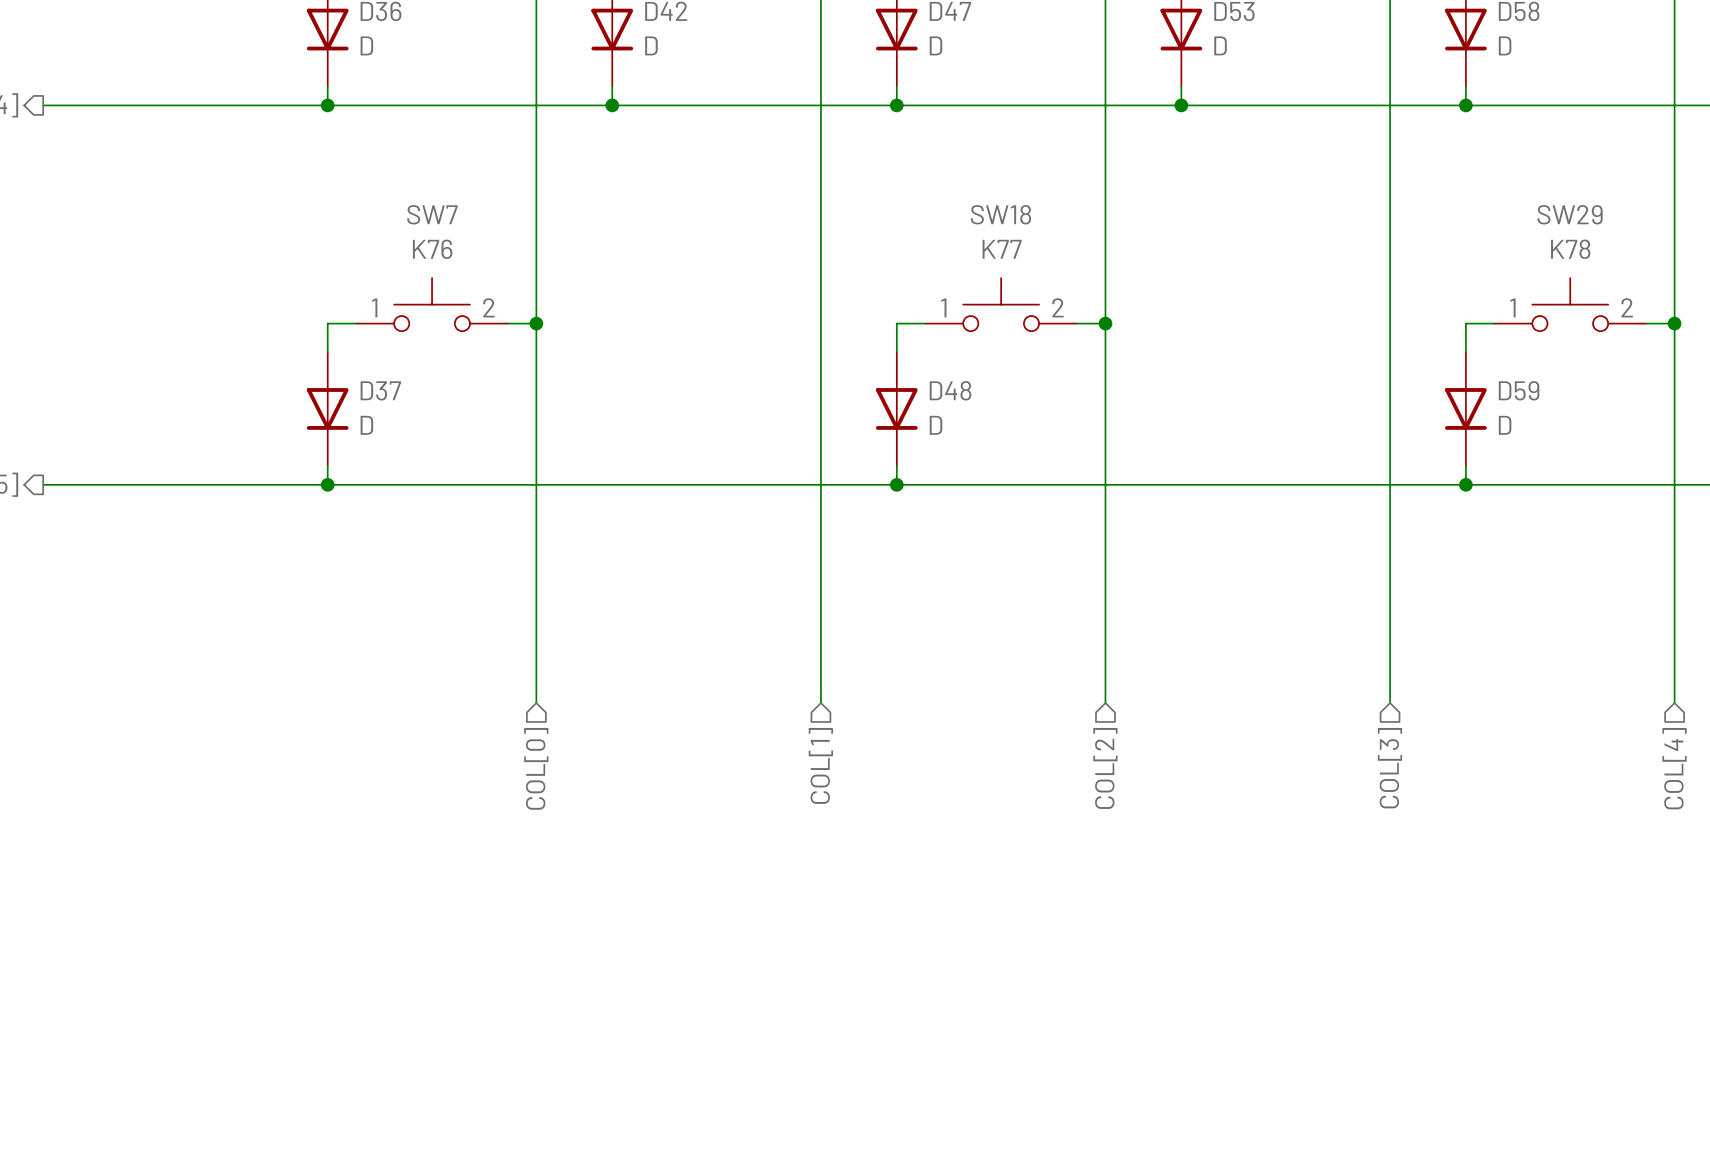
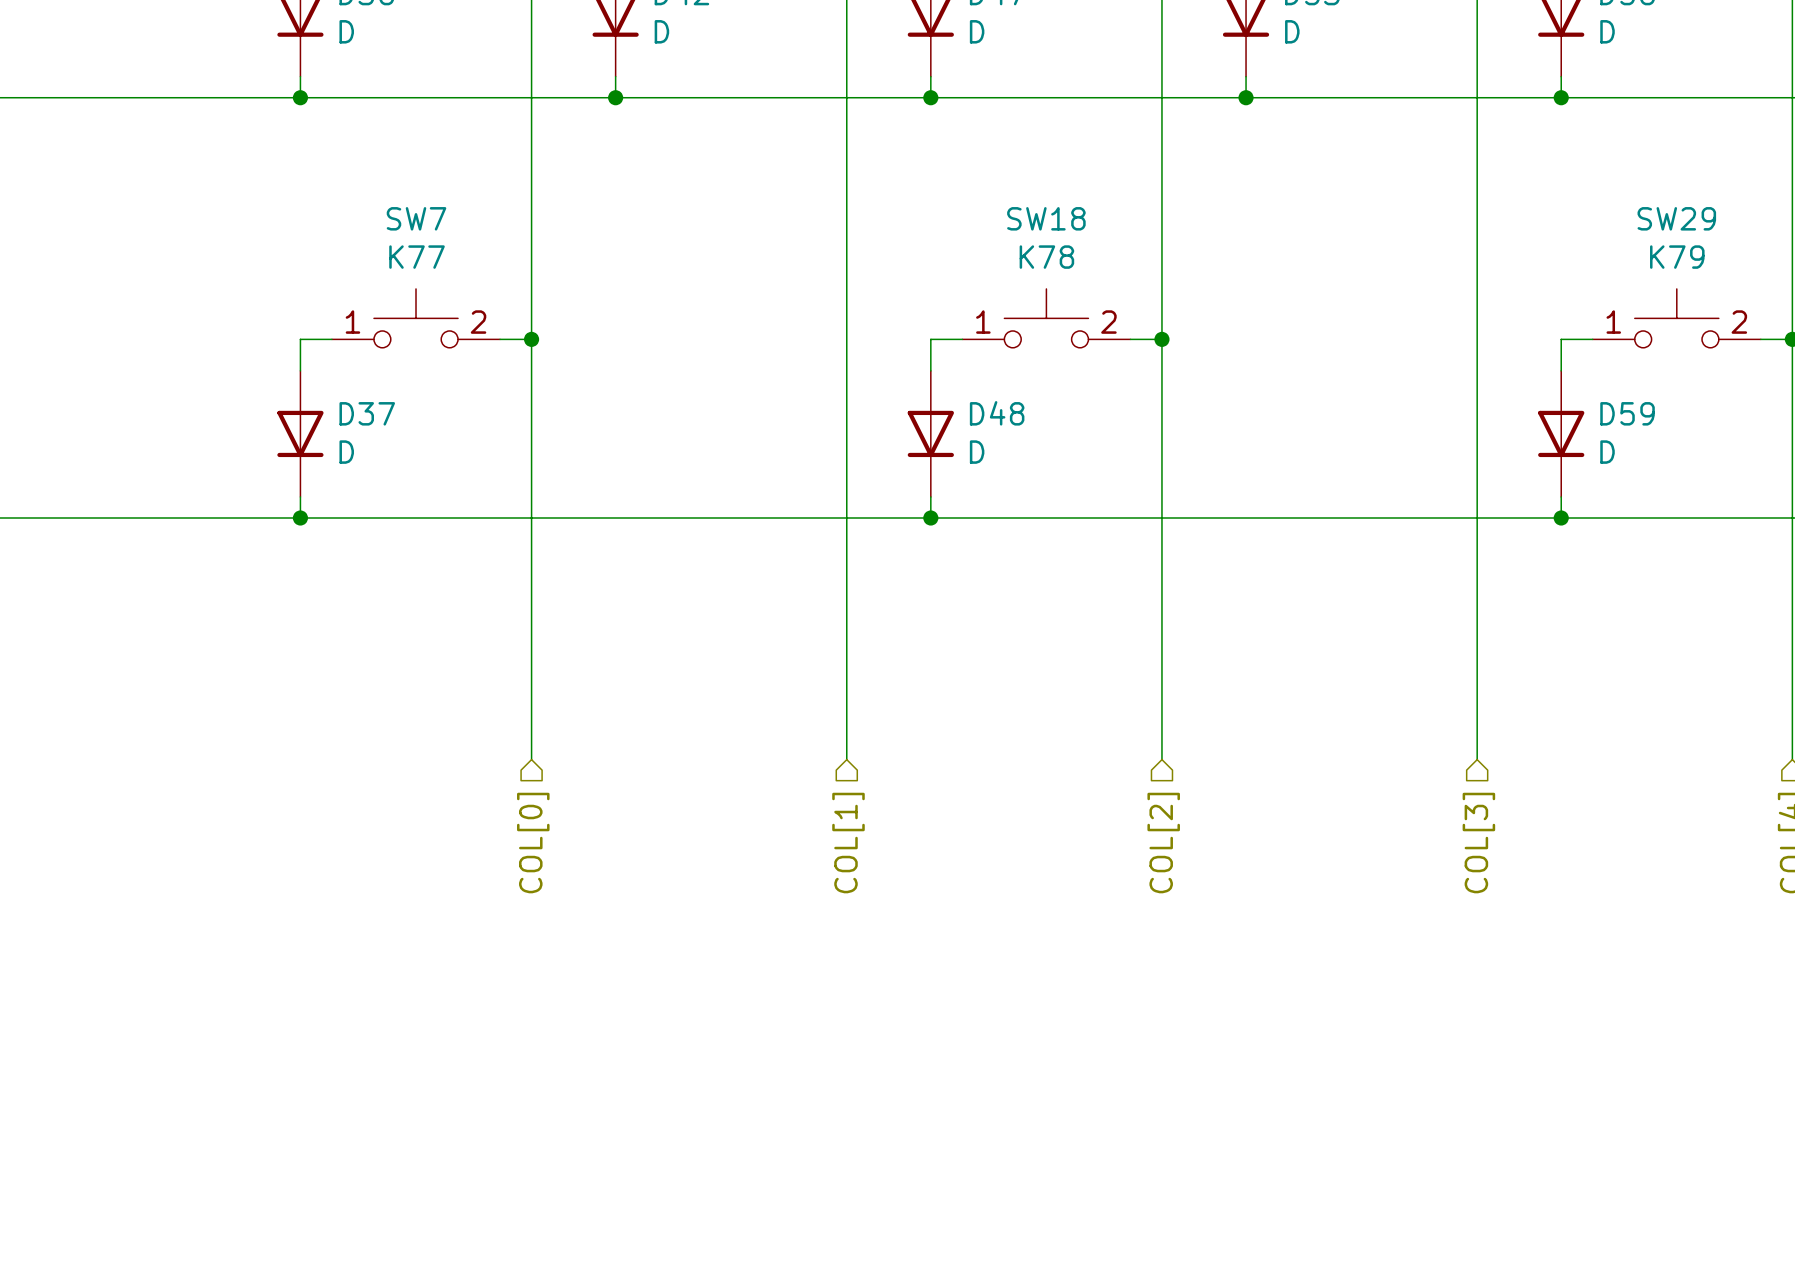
SW7 value: K76 (432, 249) -> K77 (417, 257)
SW18 value: K77 (1002, 249) -> K78 (1046, 257)
SW29 value: K78 (1570, 249) -> K79 (1677, 257)

